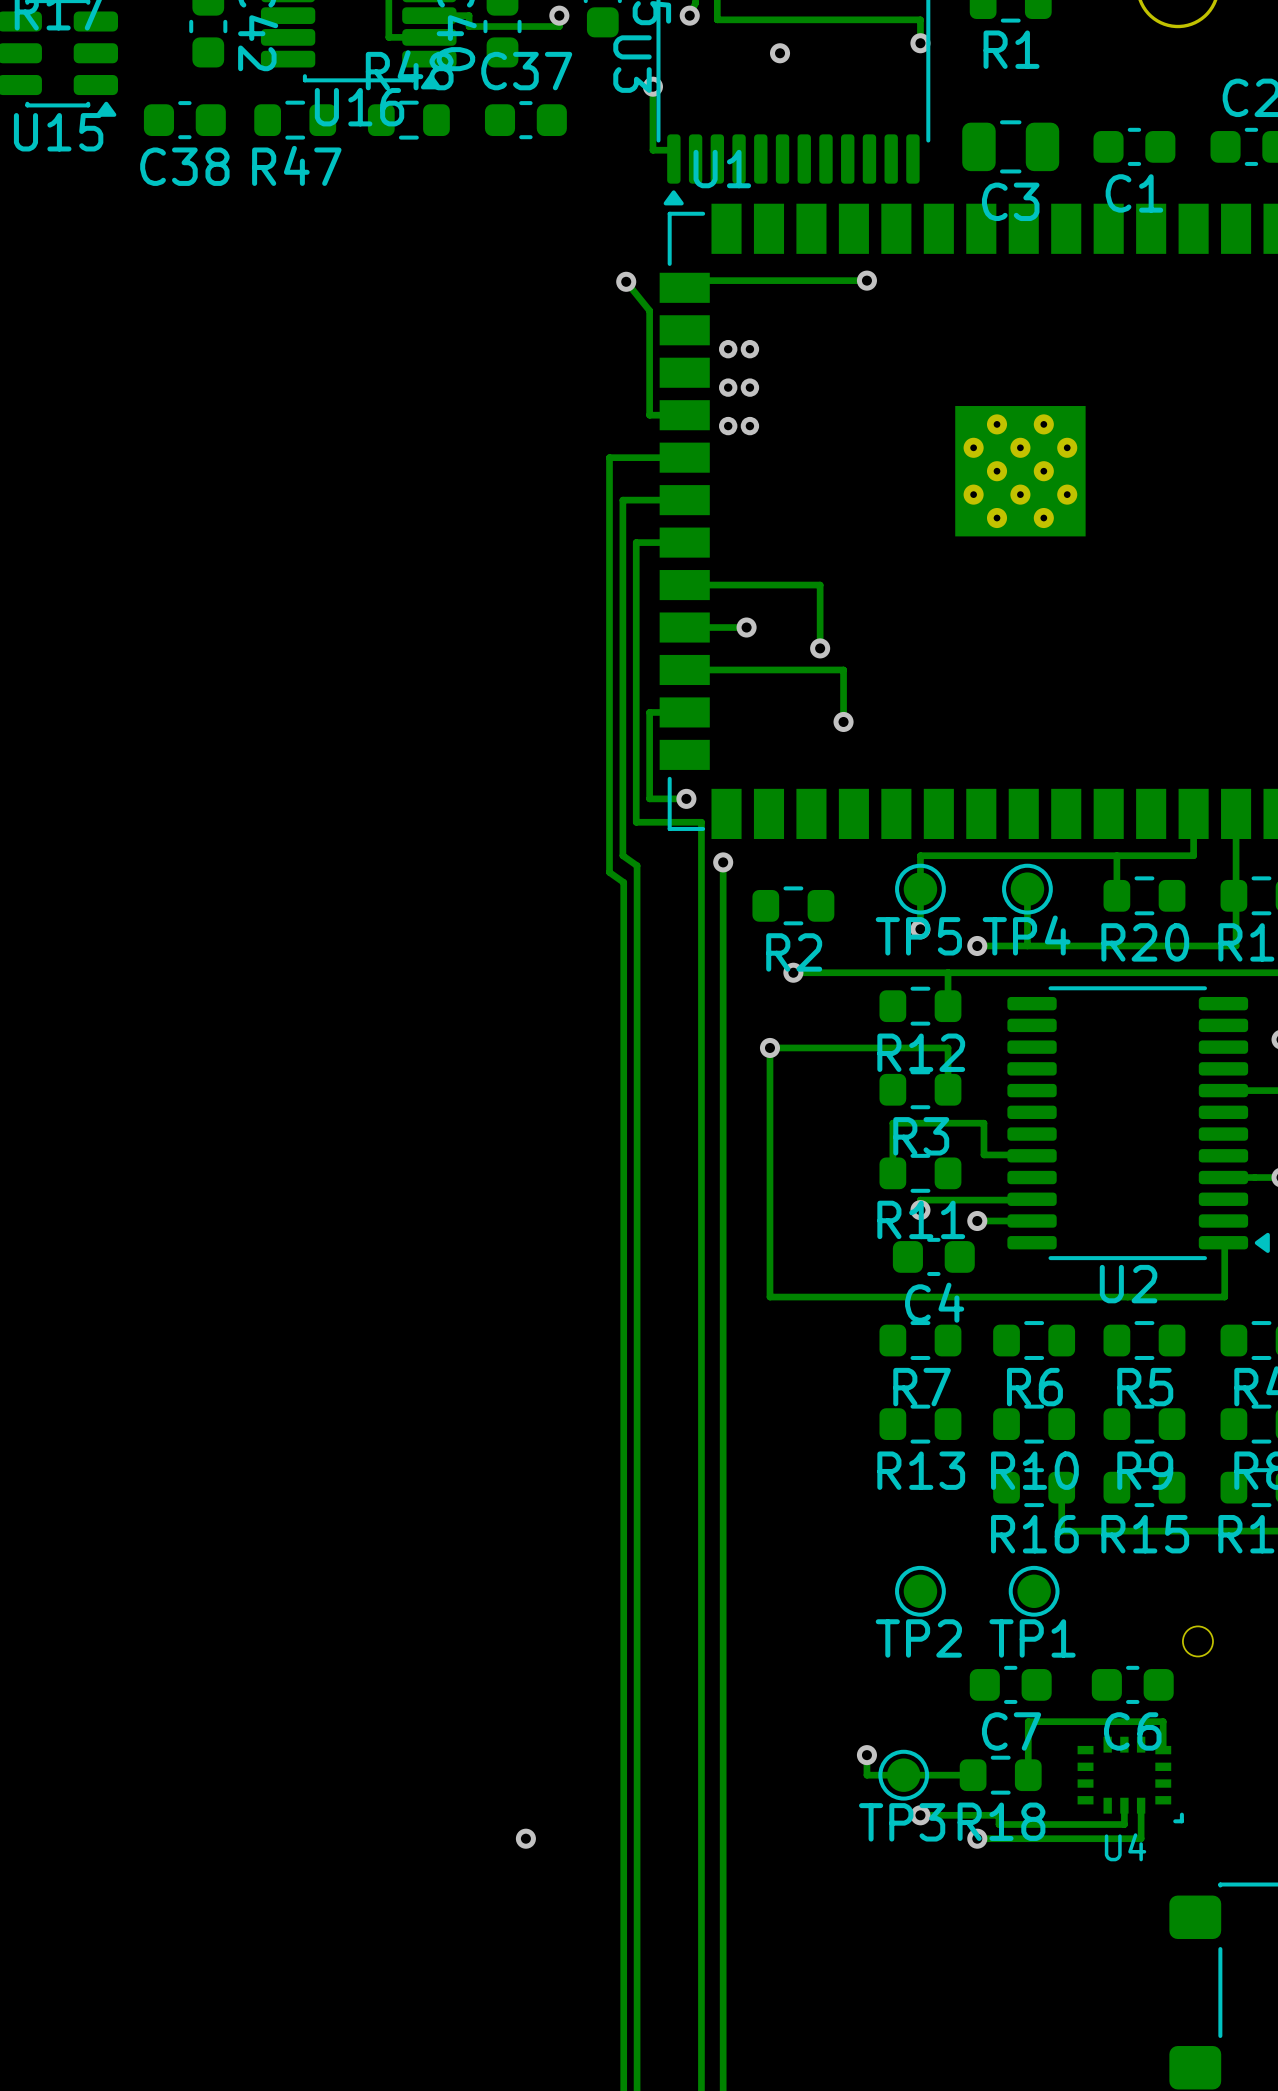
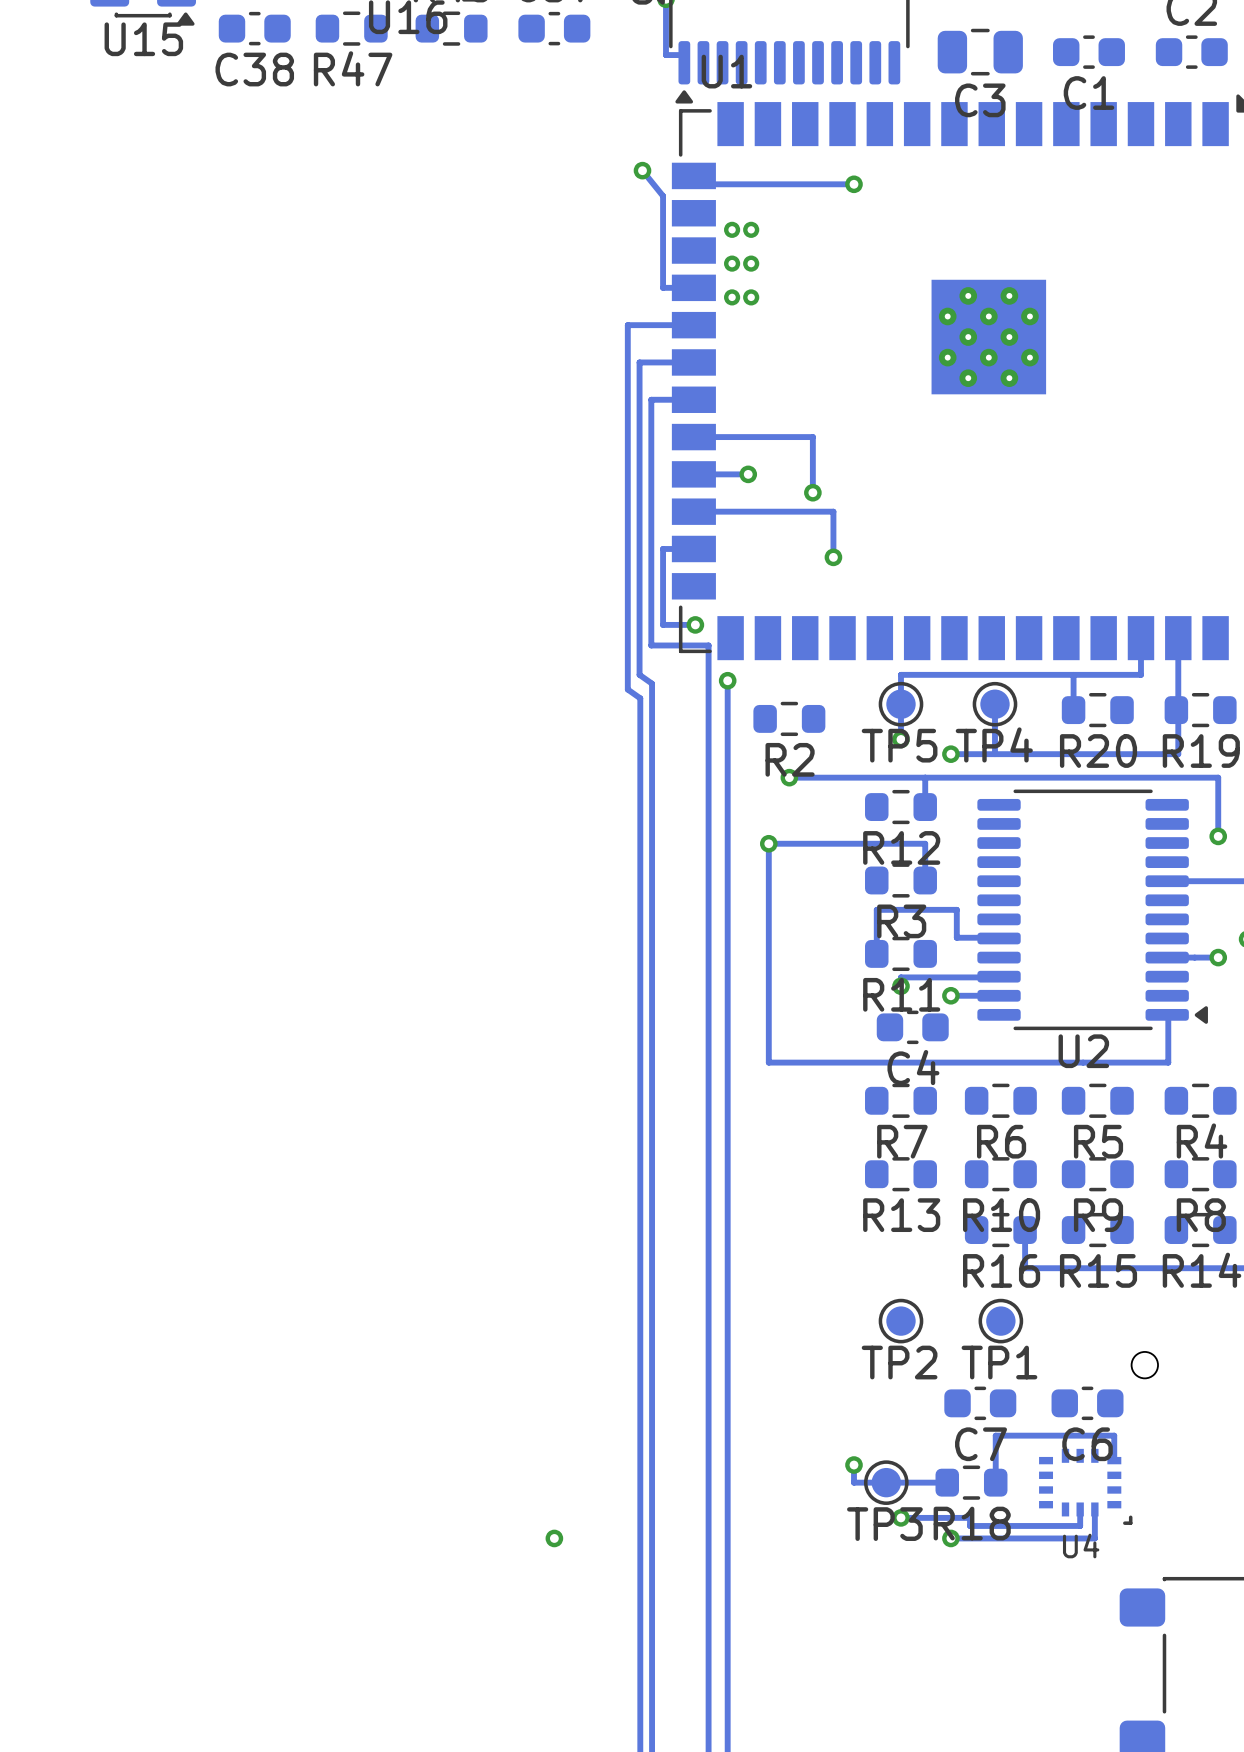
track: (866, 280) (693, 280) -> (853, 184) (701, 184)
via position: (866, 280) -> (853, 184)

